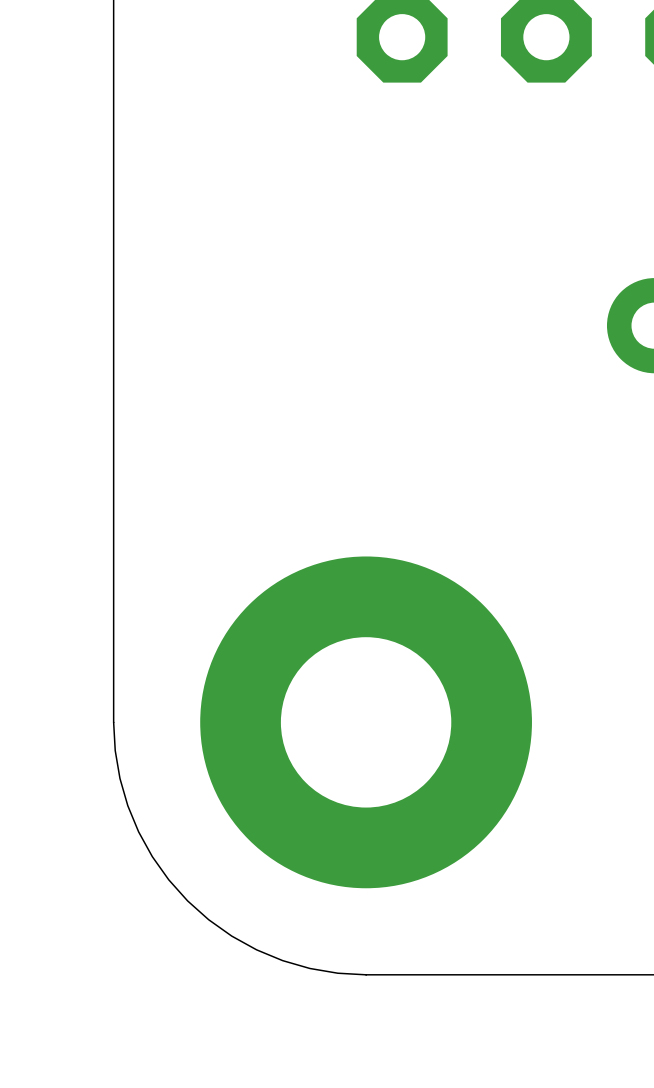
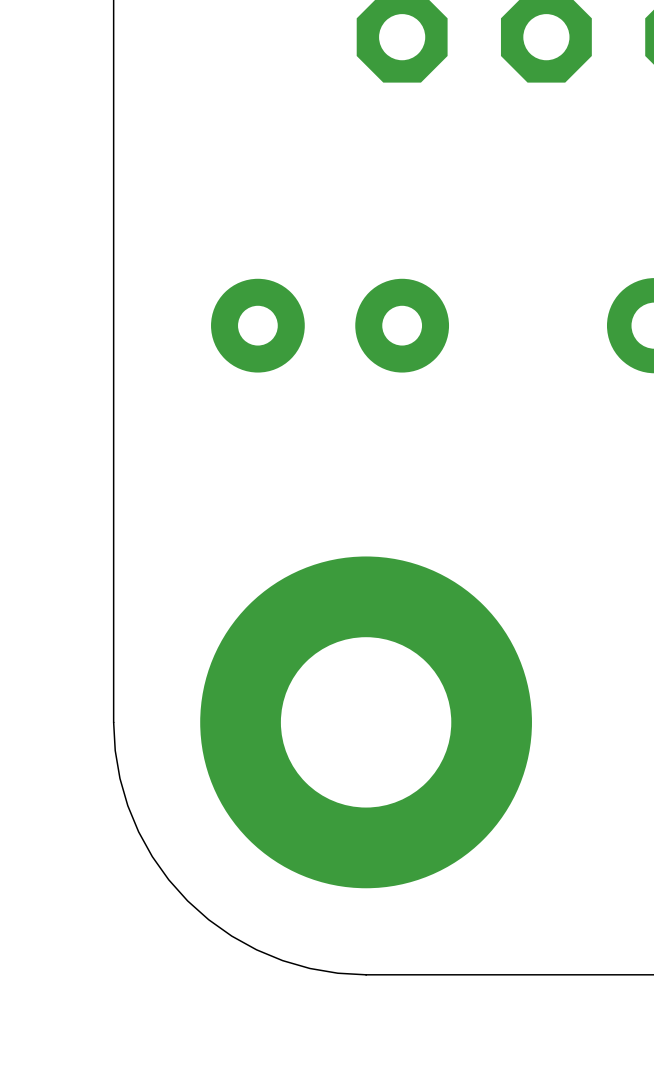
part: none -> (330, 325)

